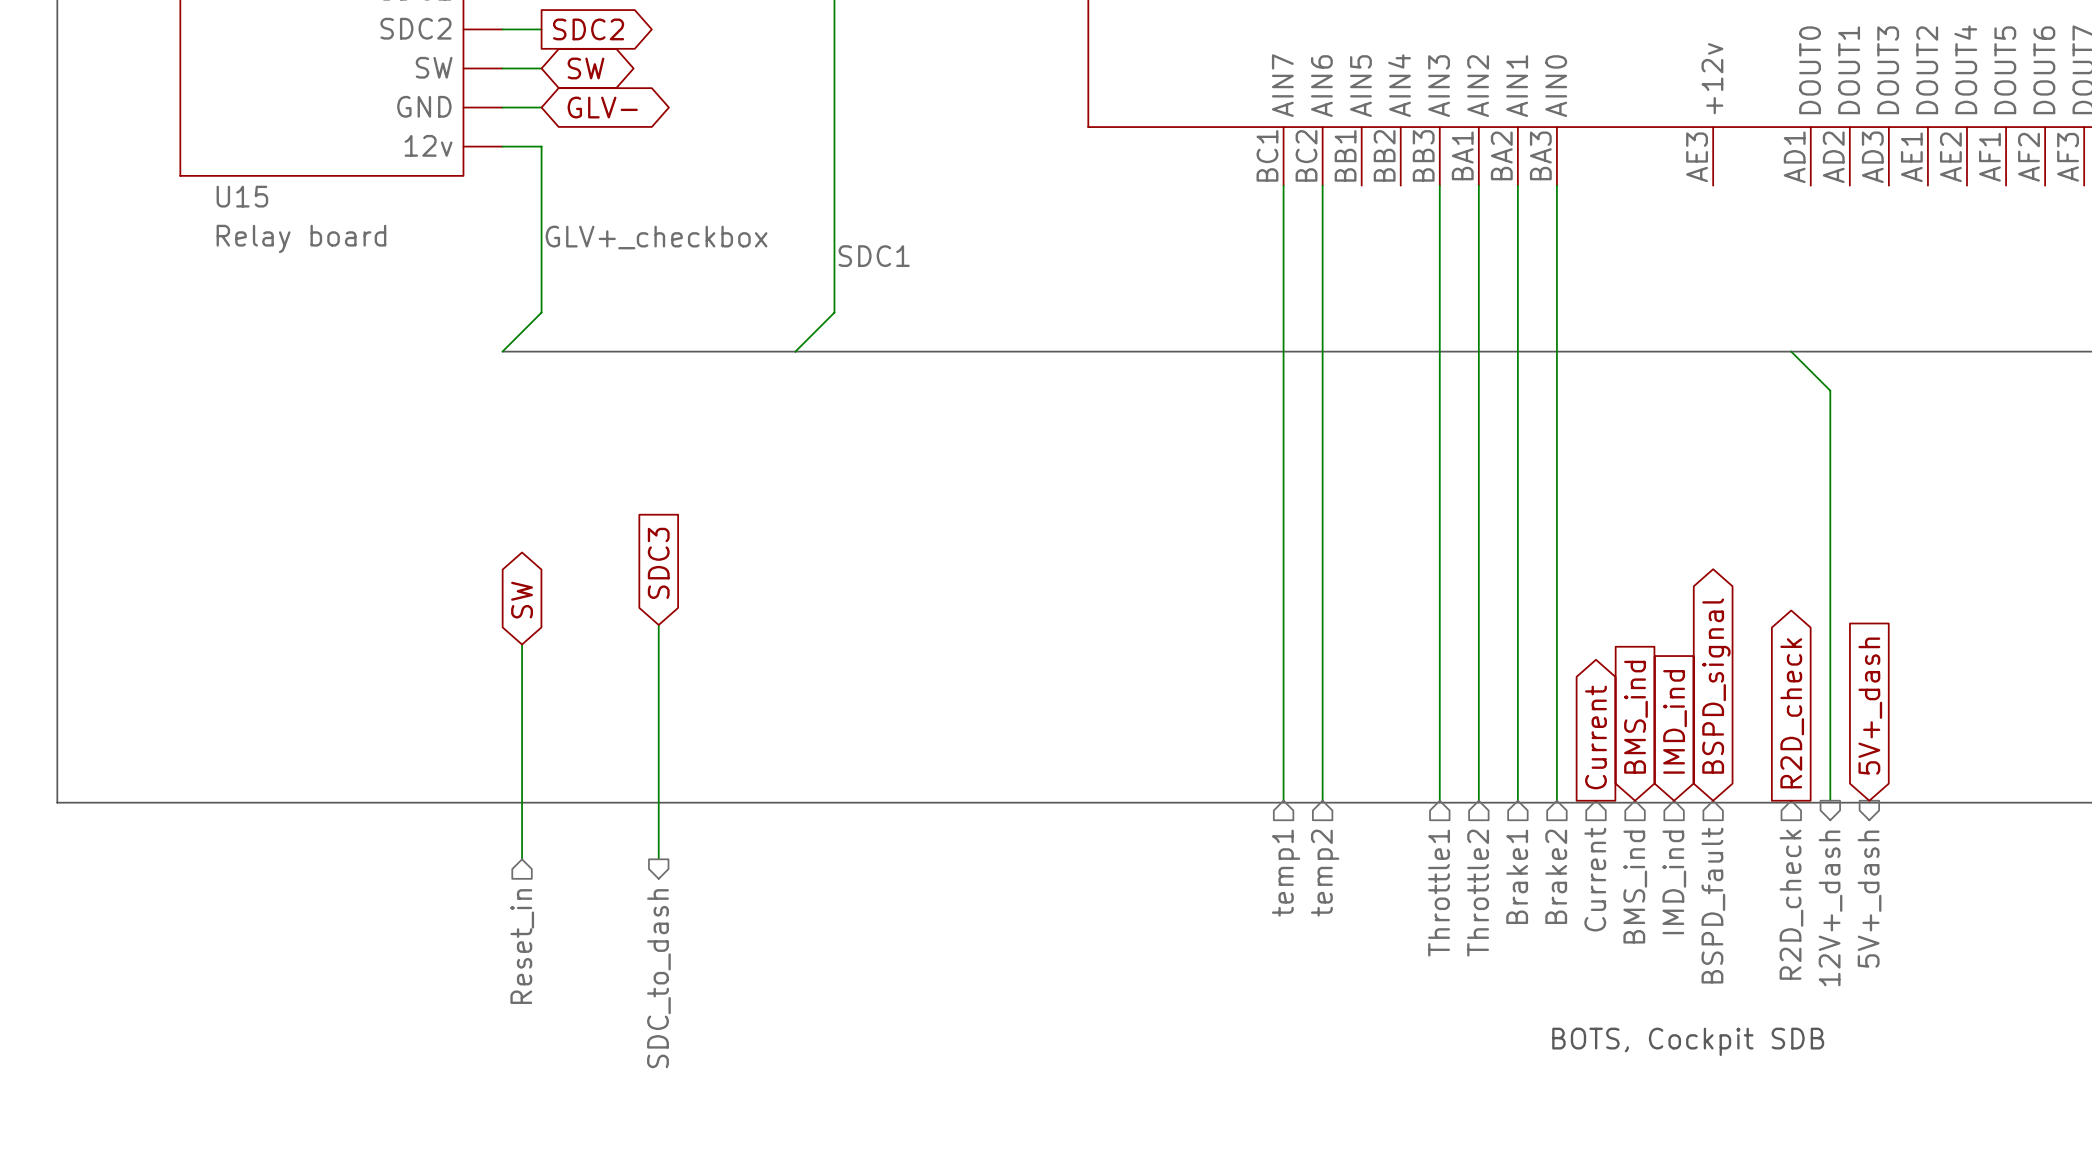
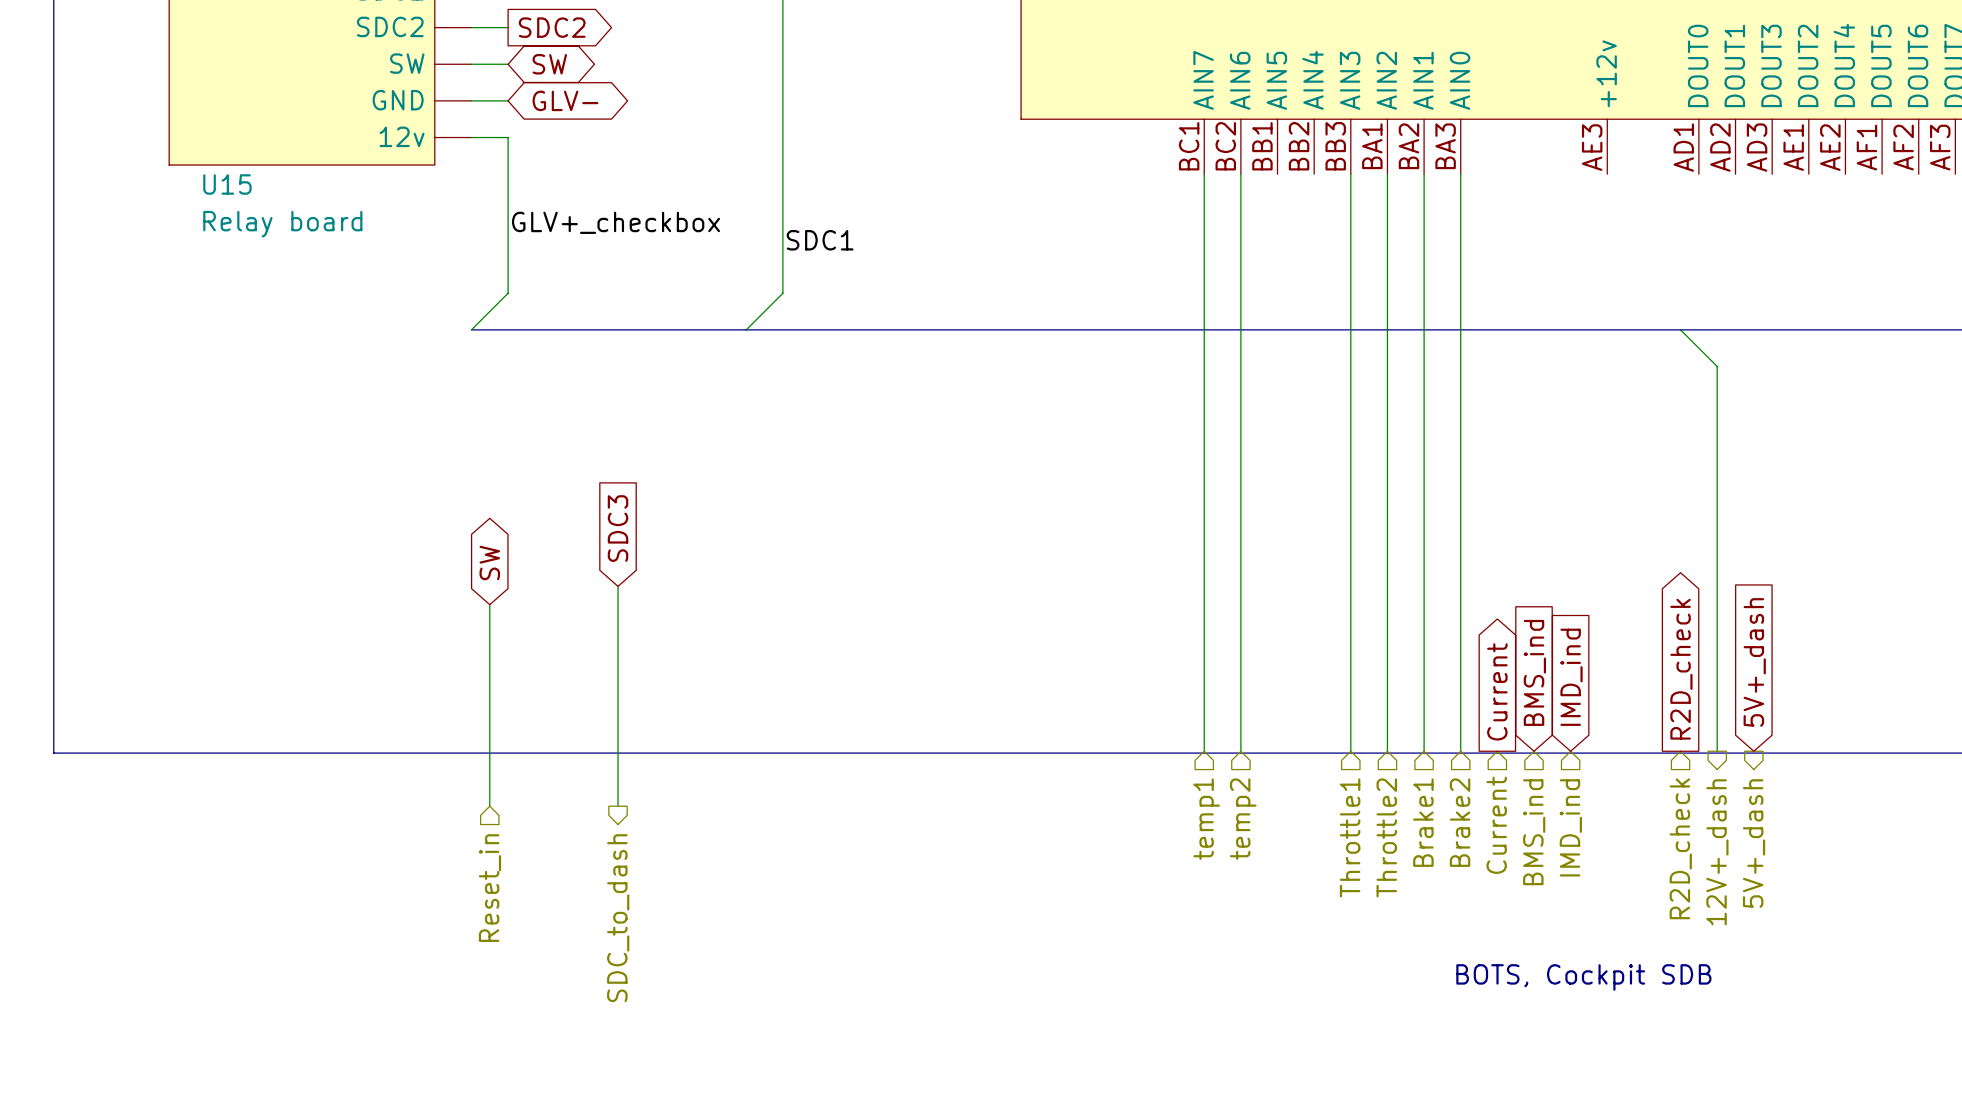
global label: BSPD_signal (1716, 686) -> none
hierarchical label: BSPD_fault (1713, 905) -> none

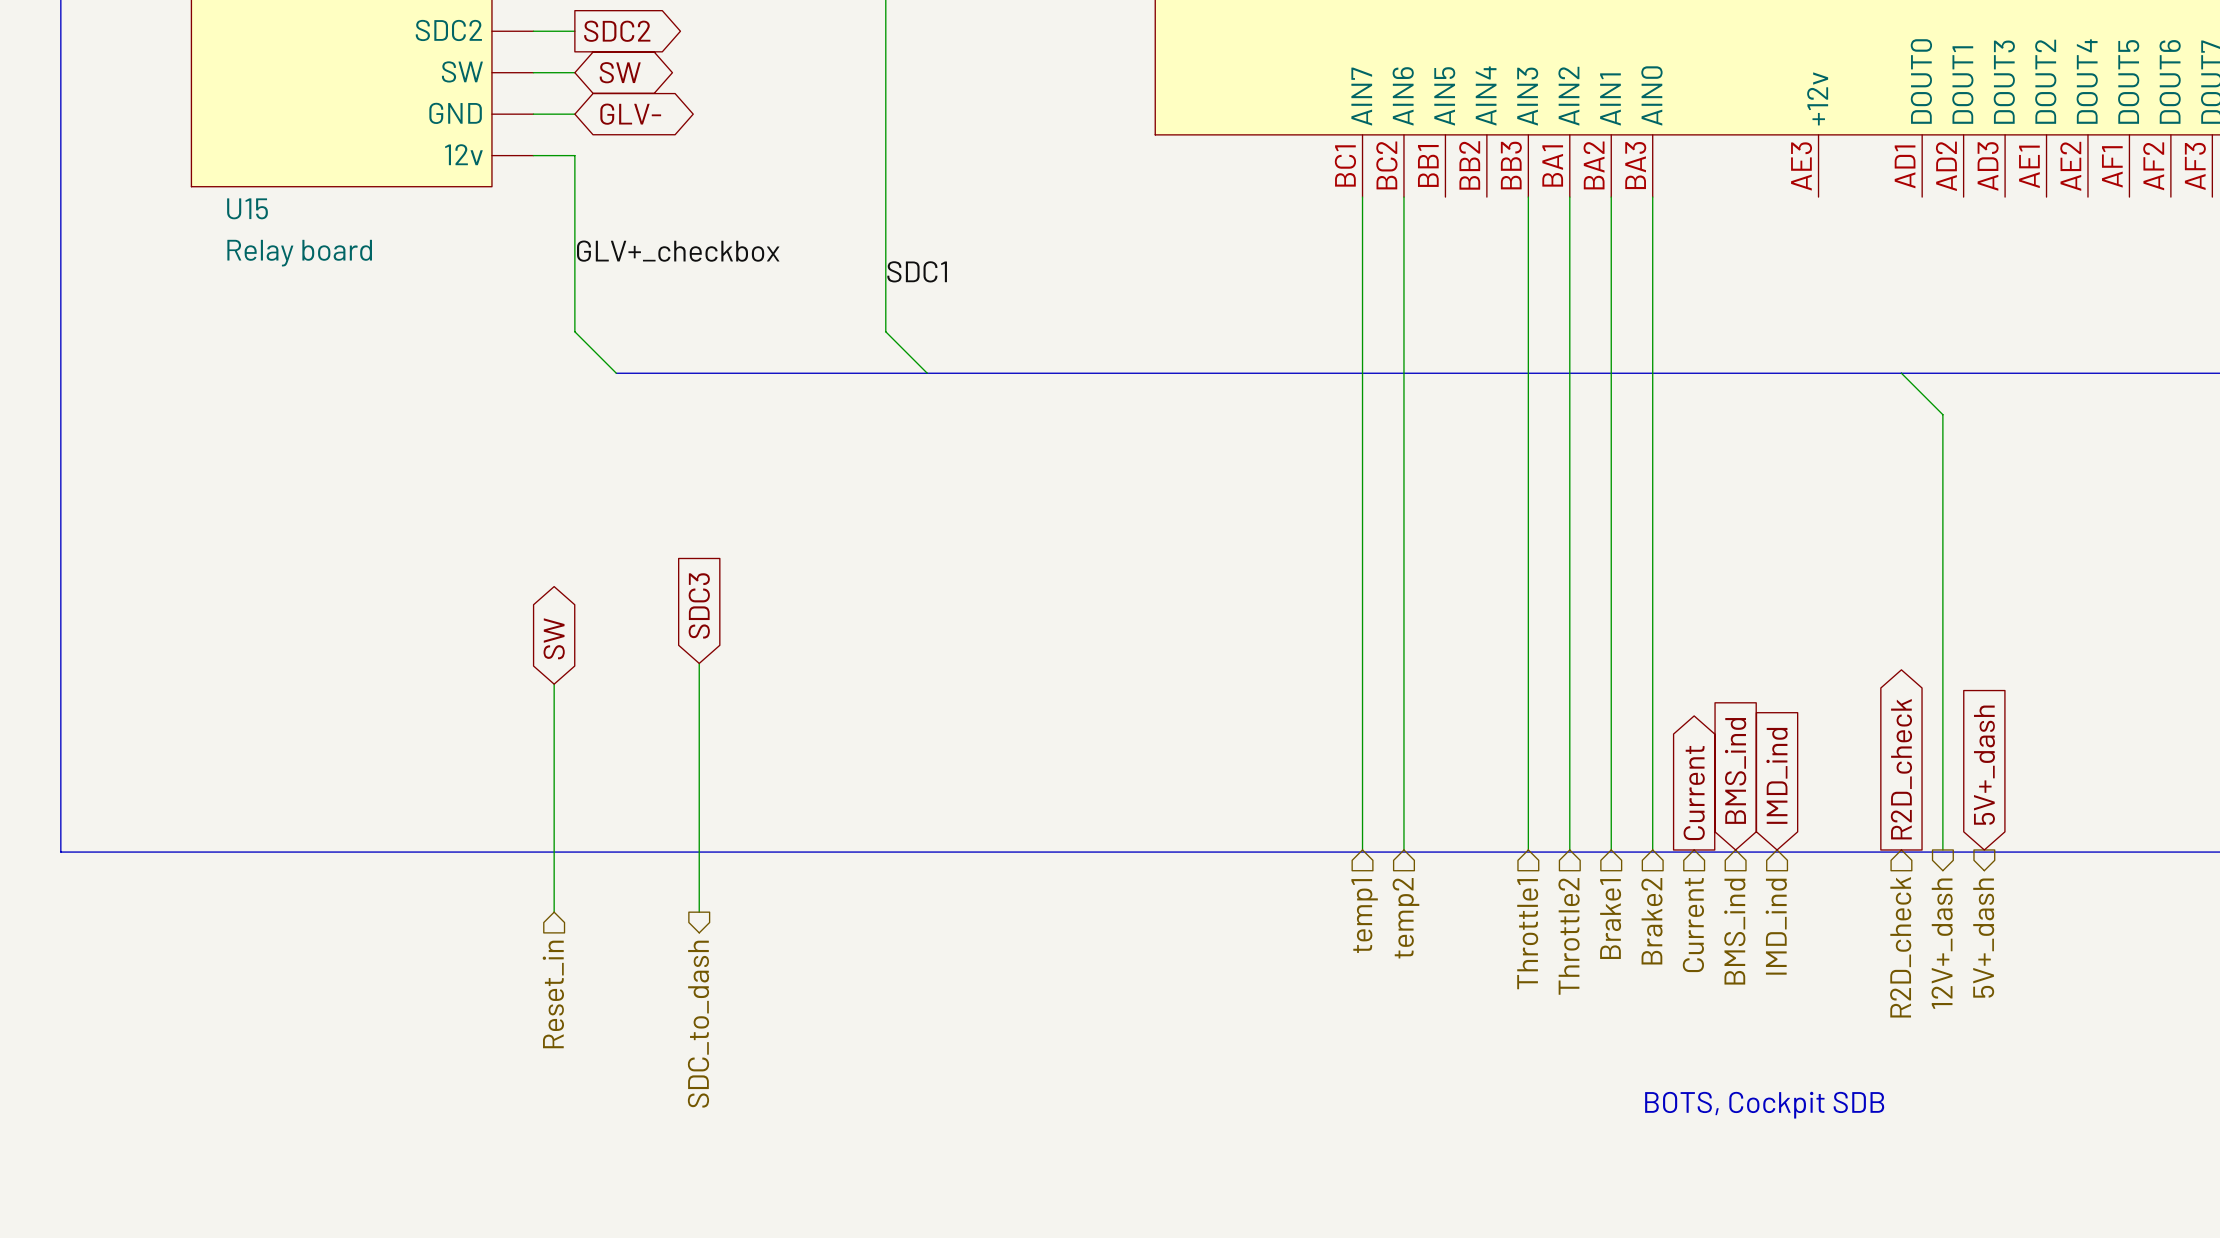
wire: (508, 293) (471, 329) -> (574, 331) (616, 373)
wire: (782, 293) (746, 329) -> (885, 331) (927, 373)
bus: (471, 329) (544, 329) -> none

